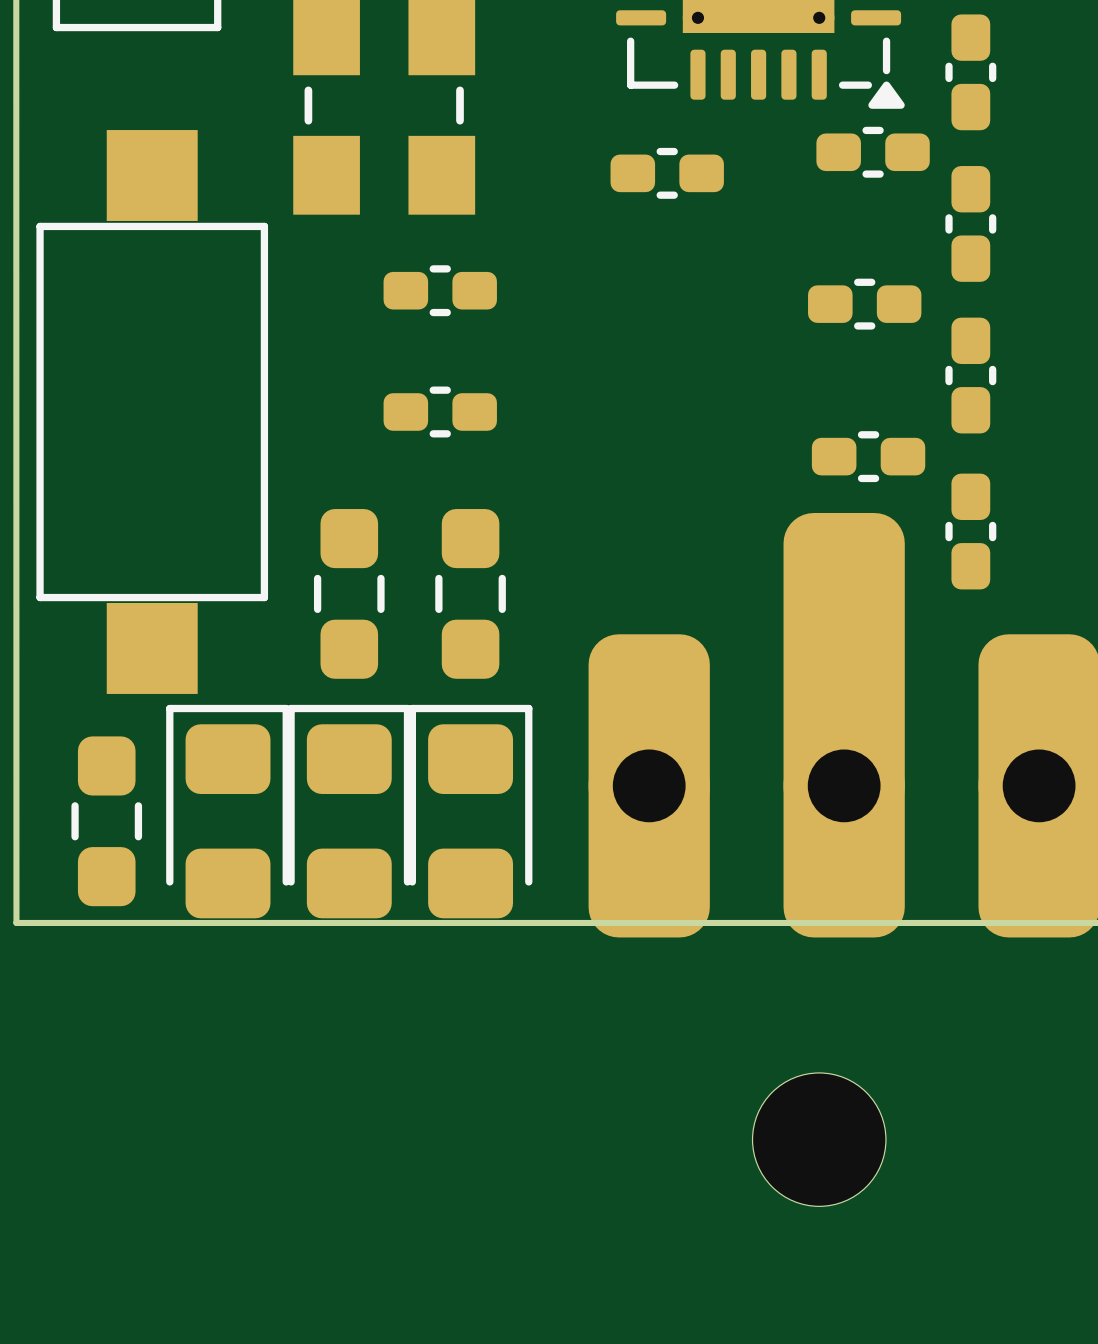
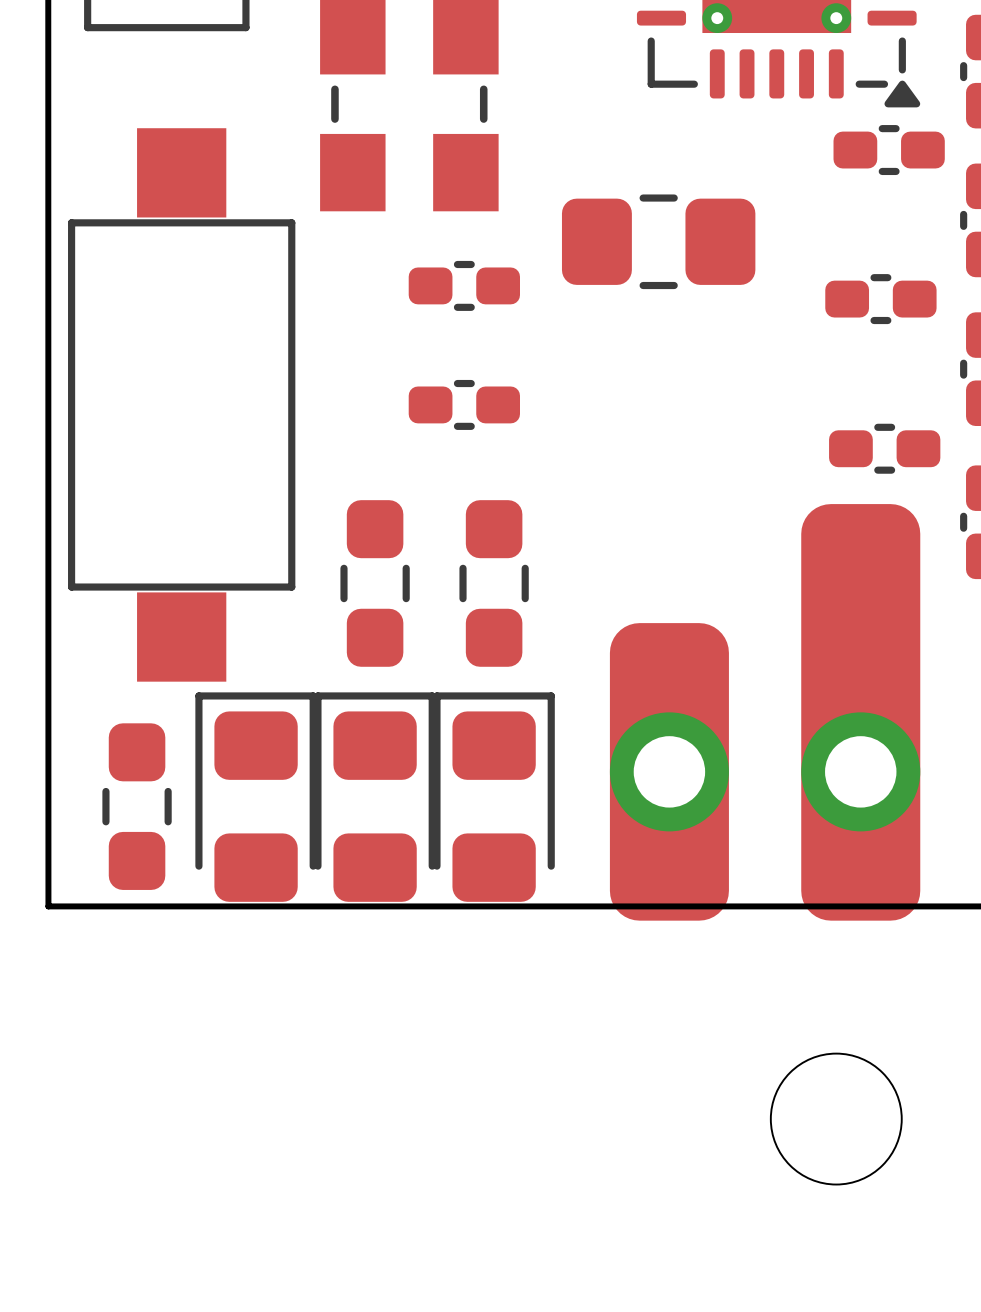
part: (667, 173) -> none
part: none -> (658, 241)

